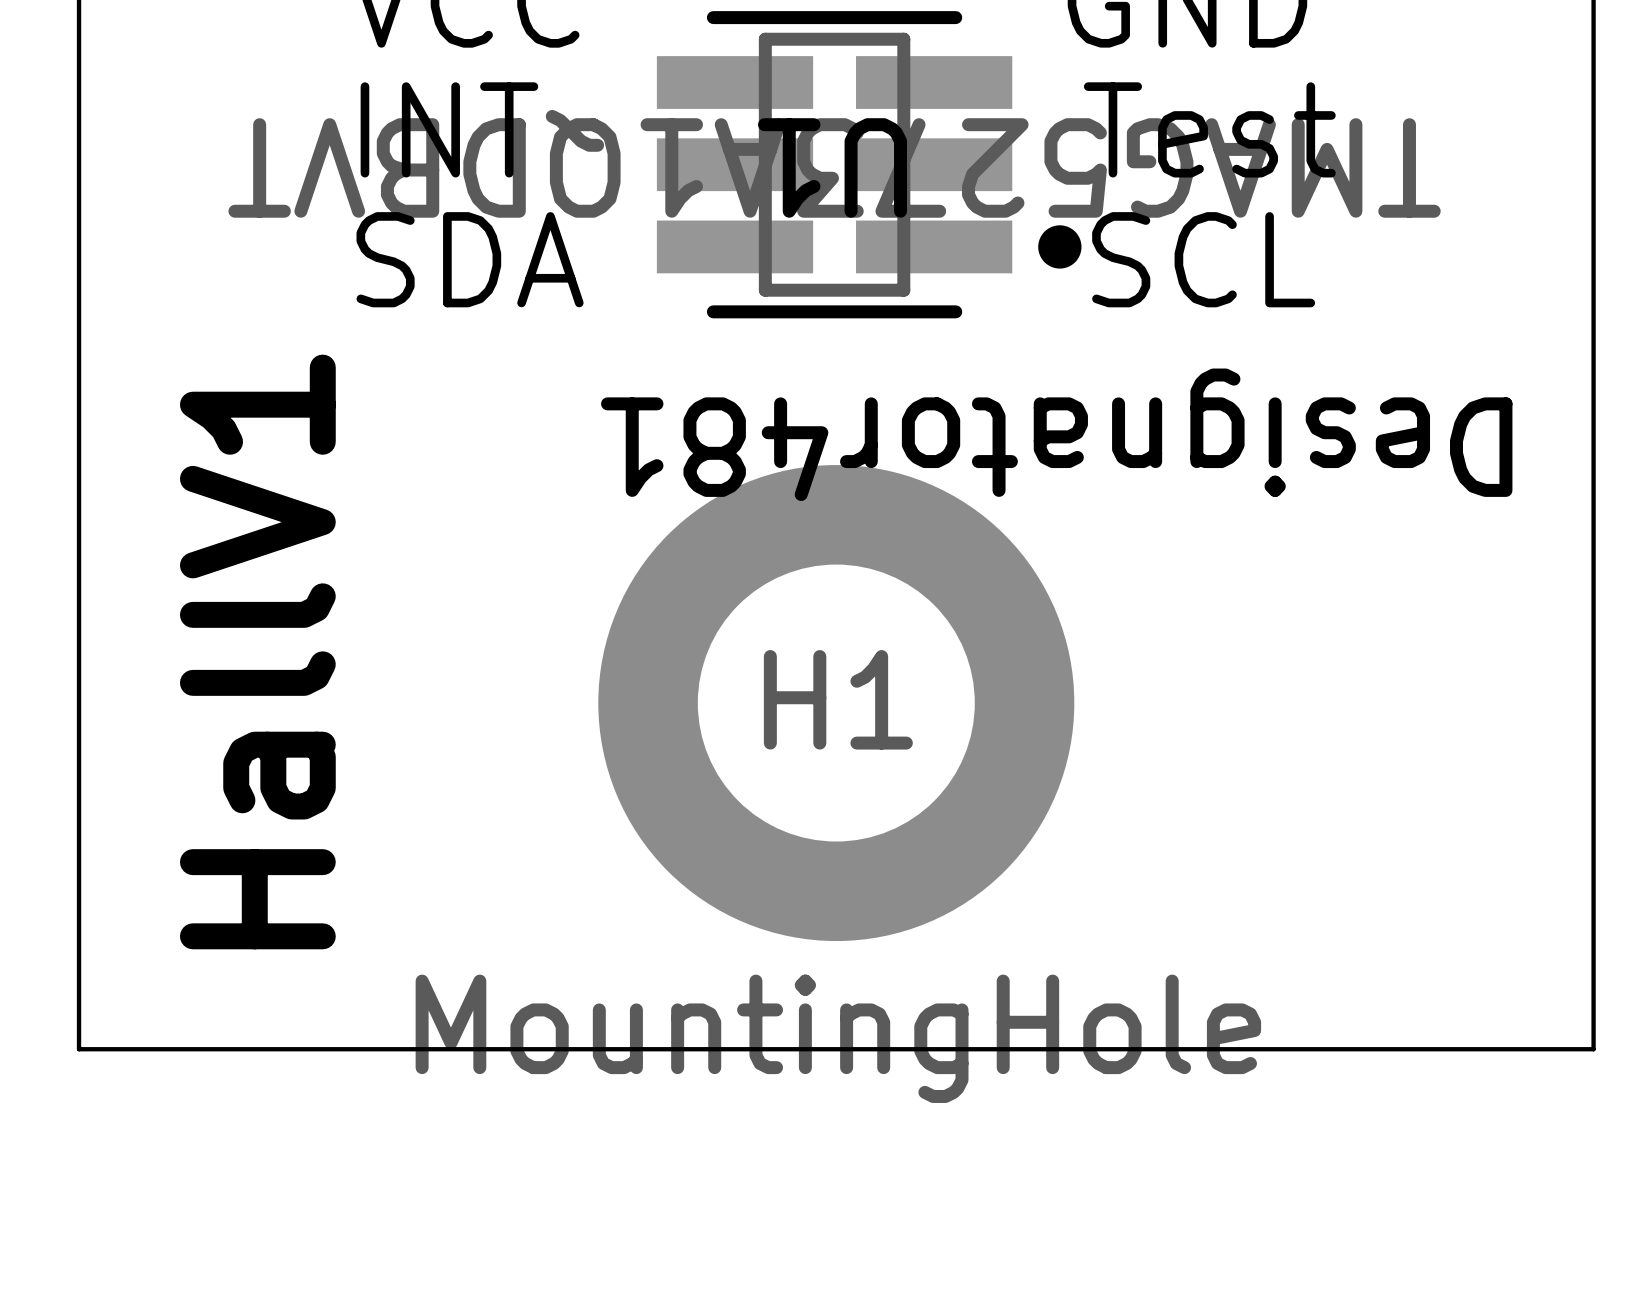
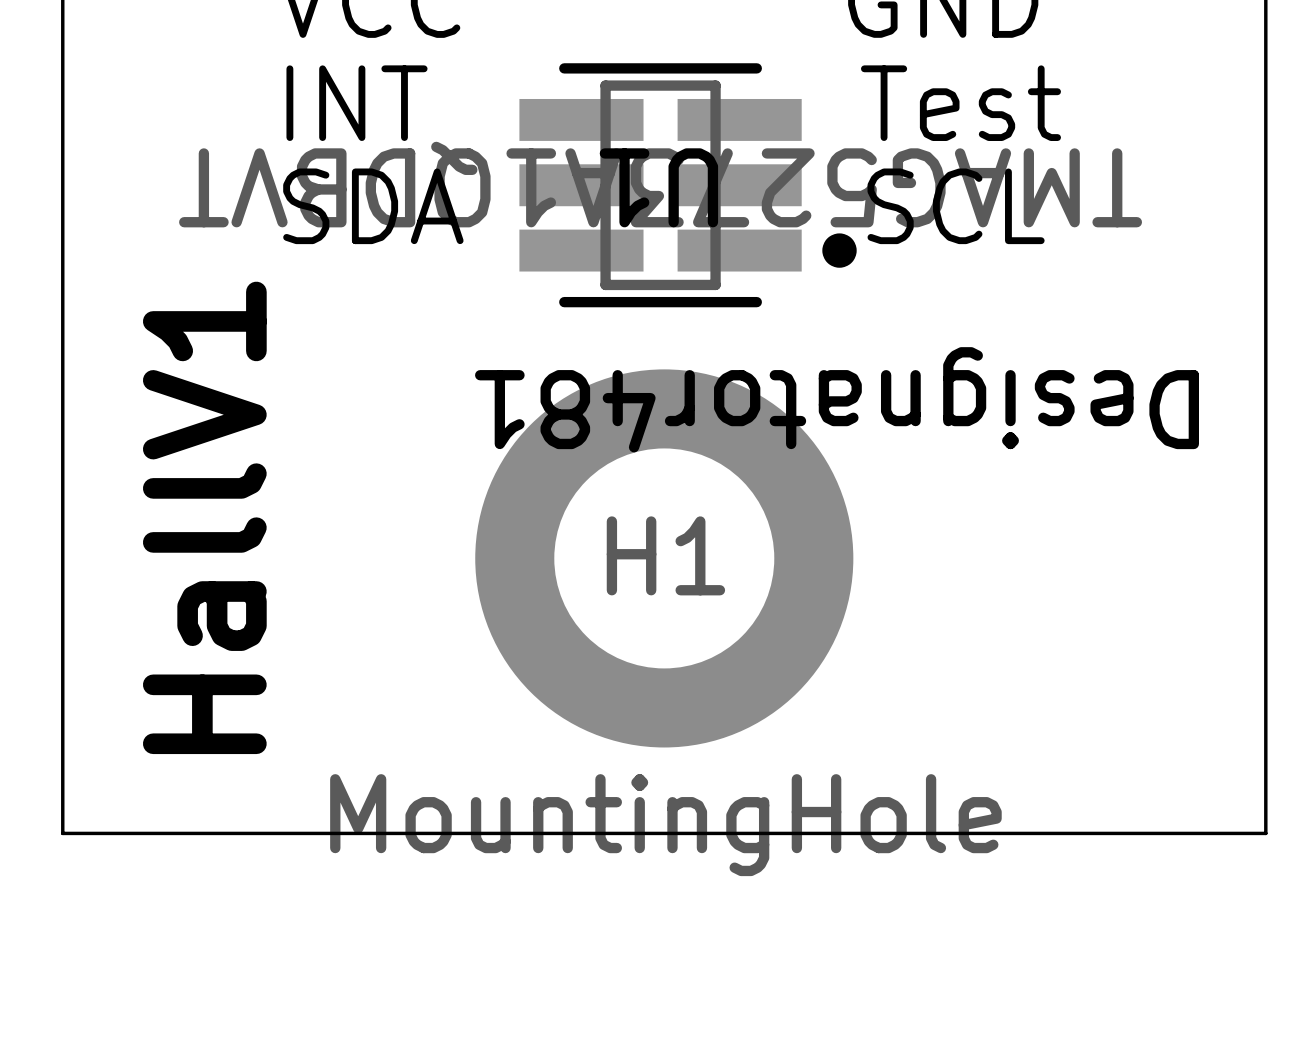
U1 position: (869, 164) -> (688, 185)

